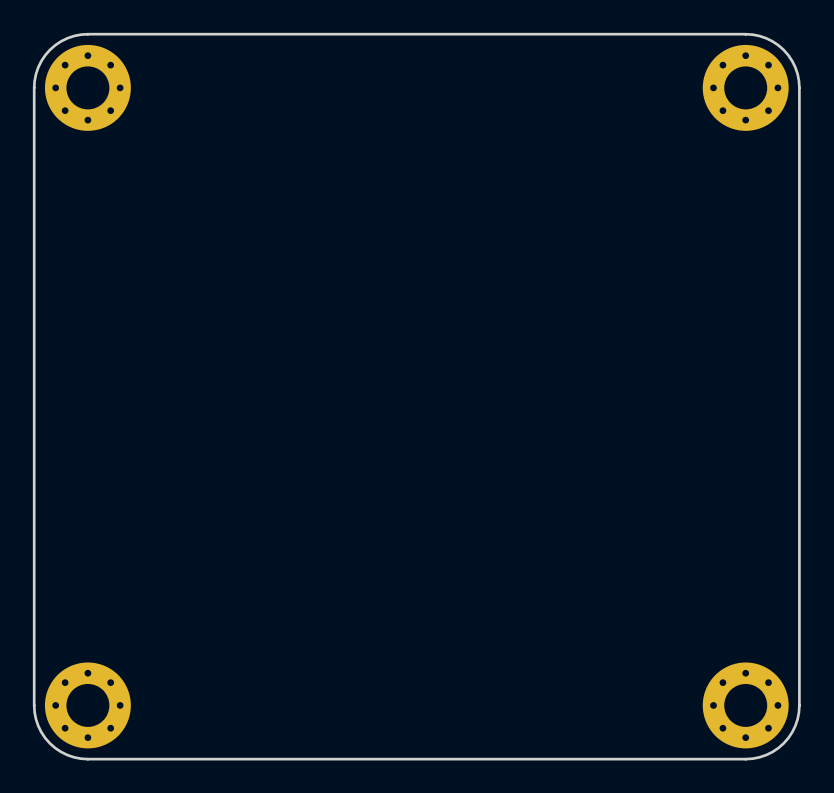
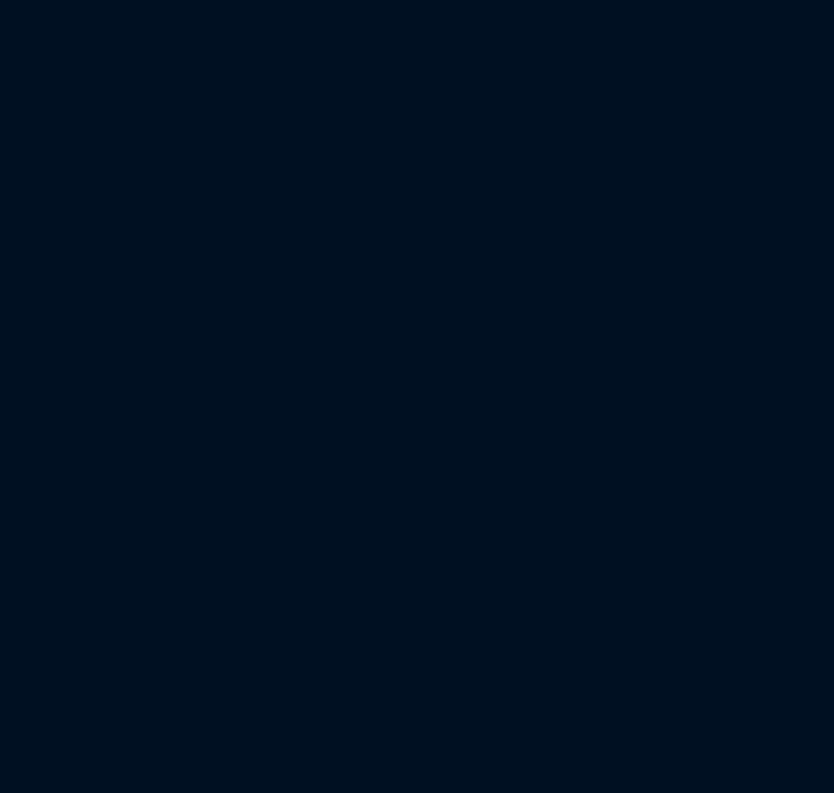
board edge: (745, 34) (87, 34) (67, 38) (49, 49) (38, 67) (34, 87) (34, 705) (38, 725) (49, 743) (67, 755) (87, 759) (745, 759) (766, 755) (783, 743) (795, 725) (799, 705) (799, 87) (795, 67) (783, 49) (766, 38) (745, 34) -> none
part: (87, 87) -> none
part: (745, 87) -> none
part: (87, 705) -> none
part: (745, 705) -> none

